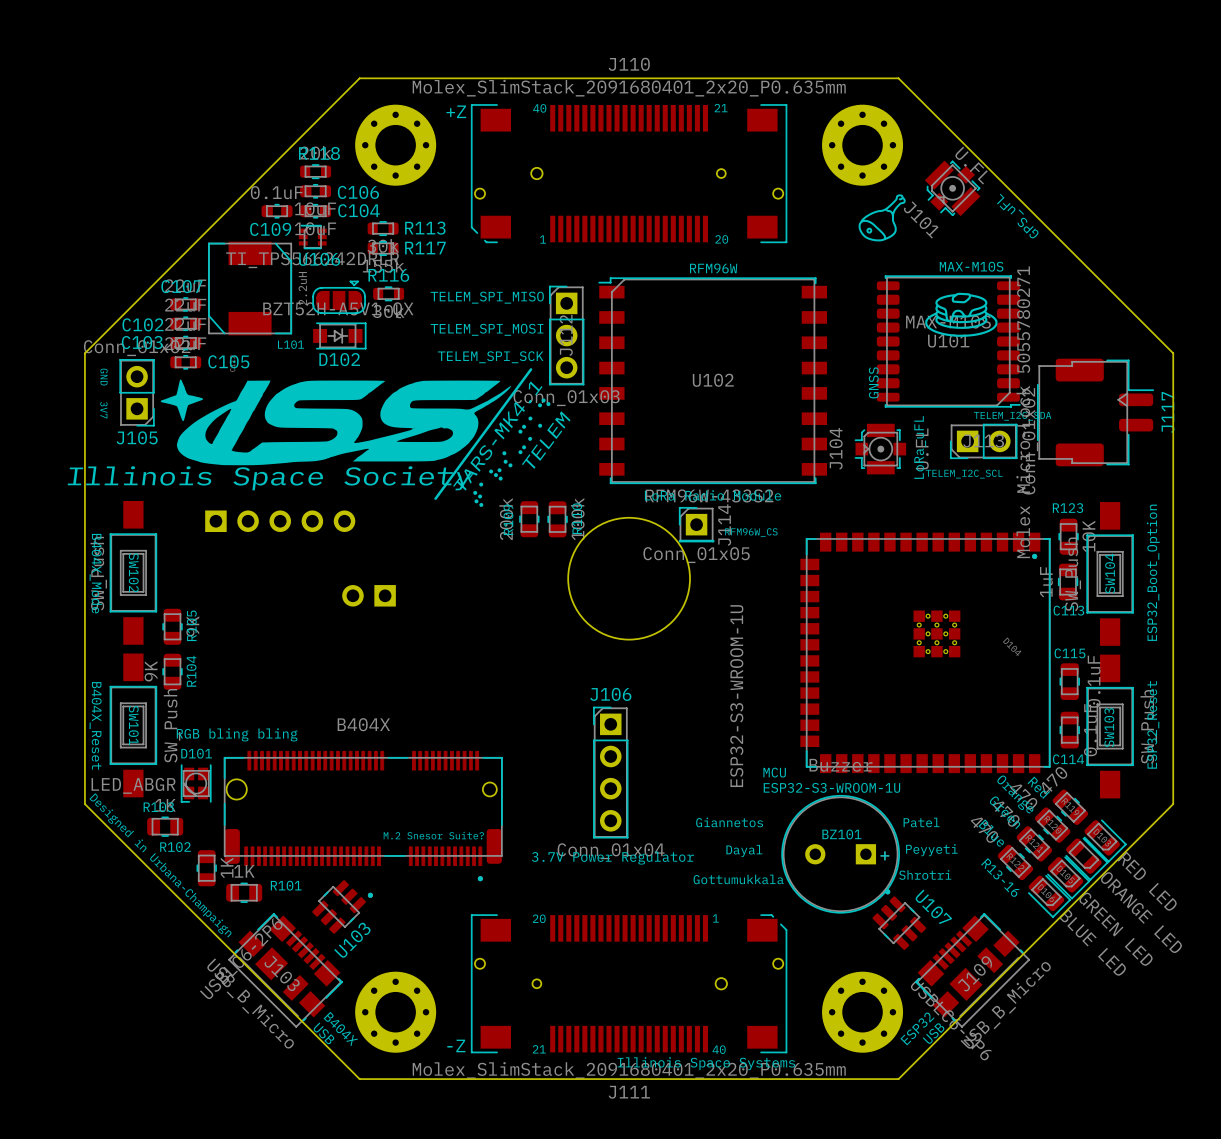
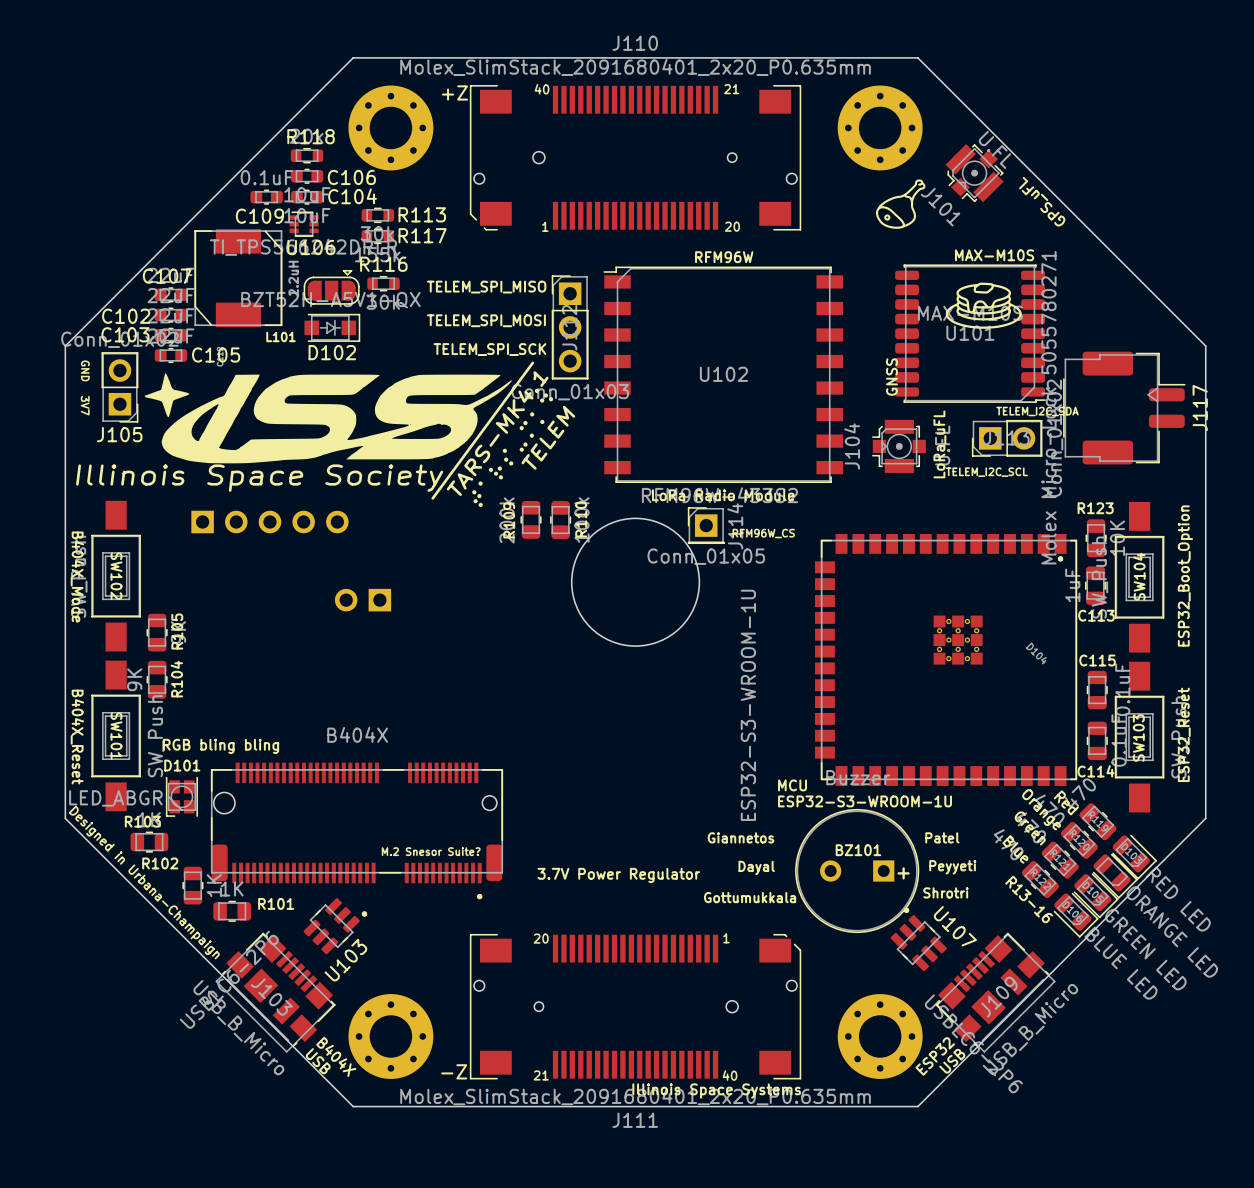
J106: Conn_01x04 (610, 772) -> none

